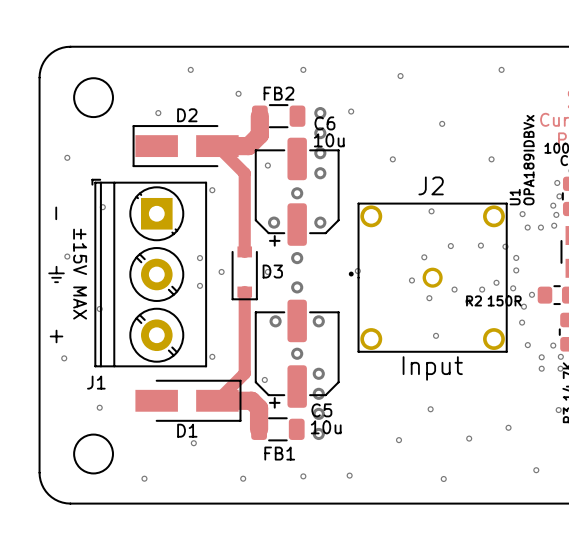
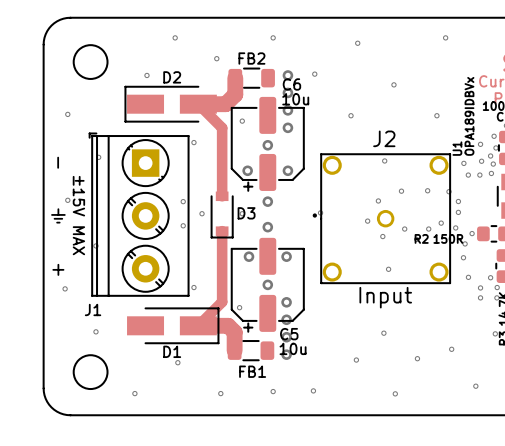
via: none -> (480, 144)
via: none -> (481, 161)

